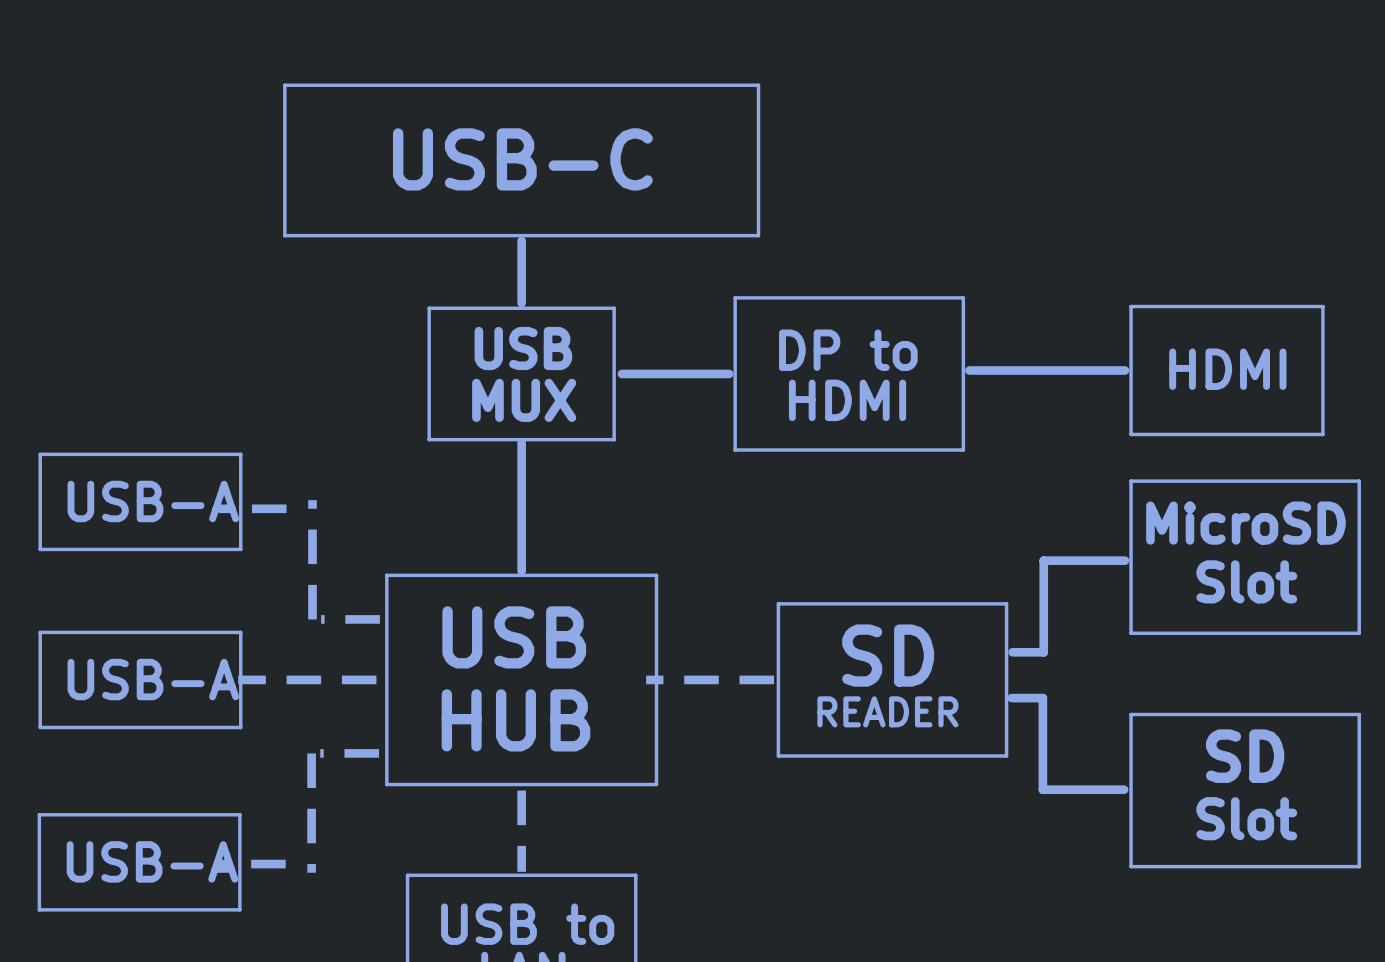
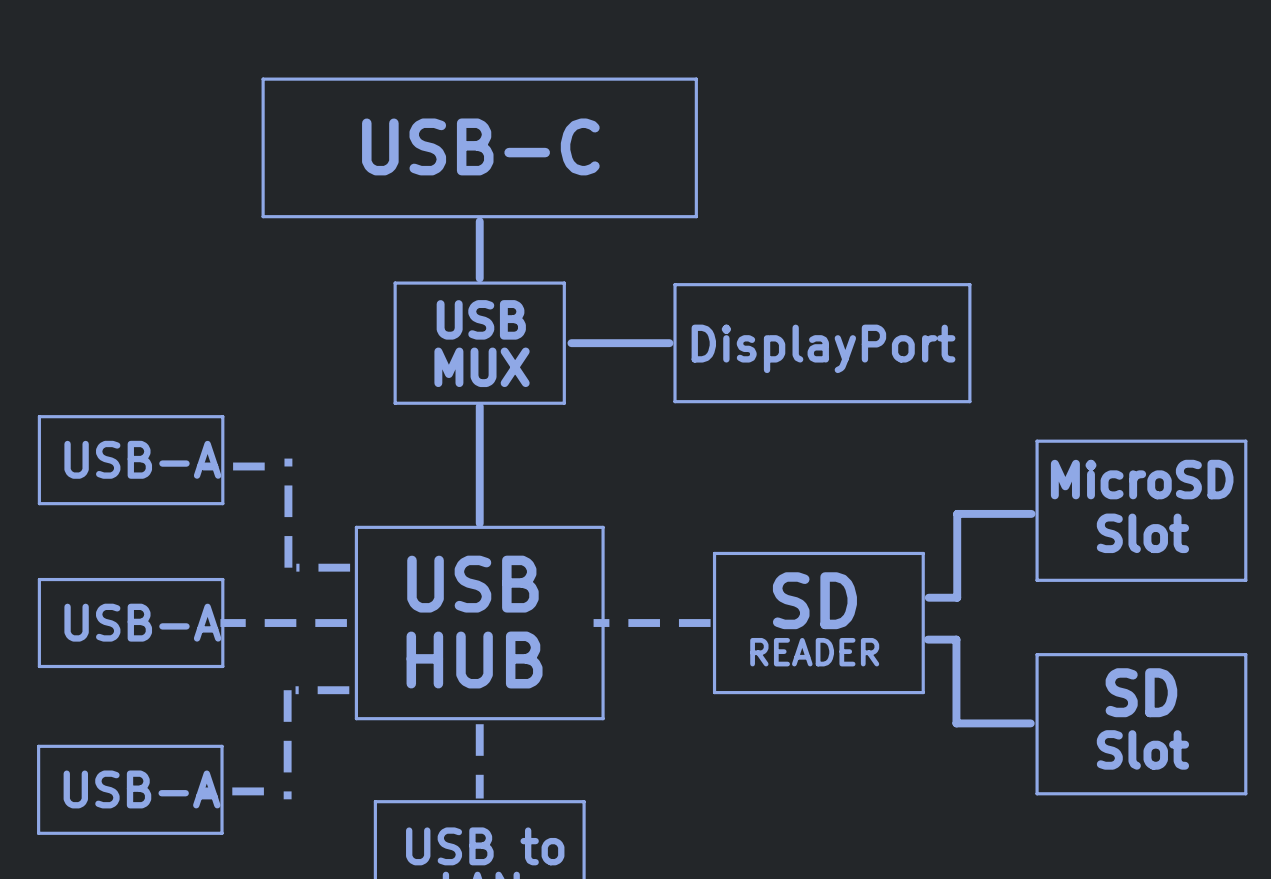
line: (1131, 306) (1322, 306) (1322, 434) (1131, 434) (1131, 306) -> none
line: (735, 309) (735, 297) (963, 297) (963, 450) (735, 450) (735, 437) -> (675, 284) (969, 284) (969, 401) (675, 401)
text: DP to (848, 350) -> none
text: HDMI (1227, 369) -> none
line: (969, 370) (1124, 370) -> none
text: none -> DisplayPort (823, 348)
text: HDMI (847, 400) -> none

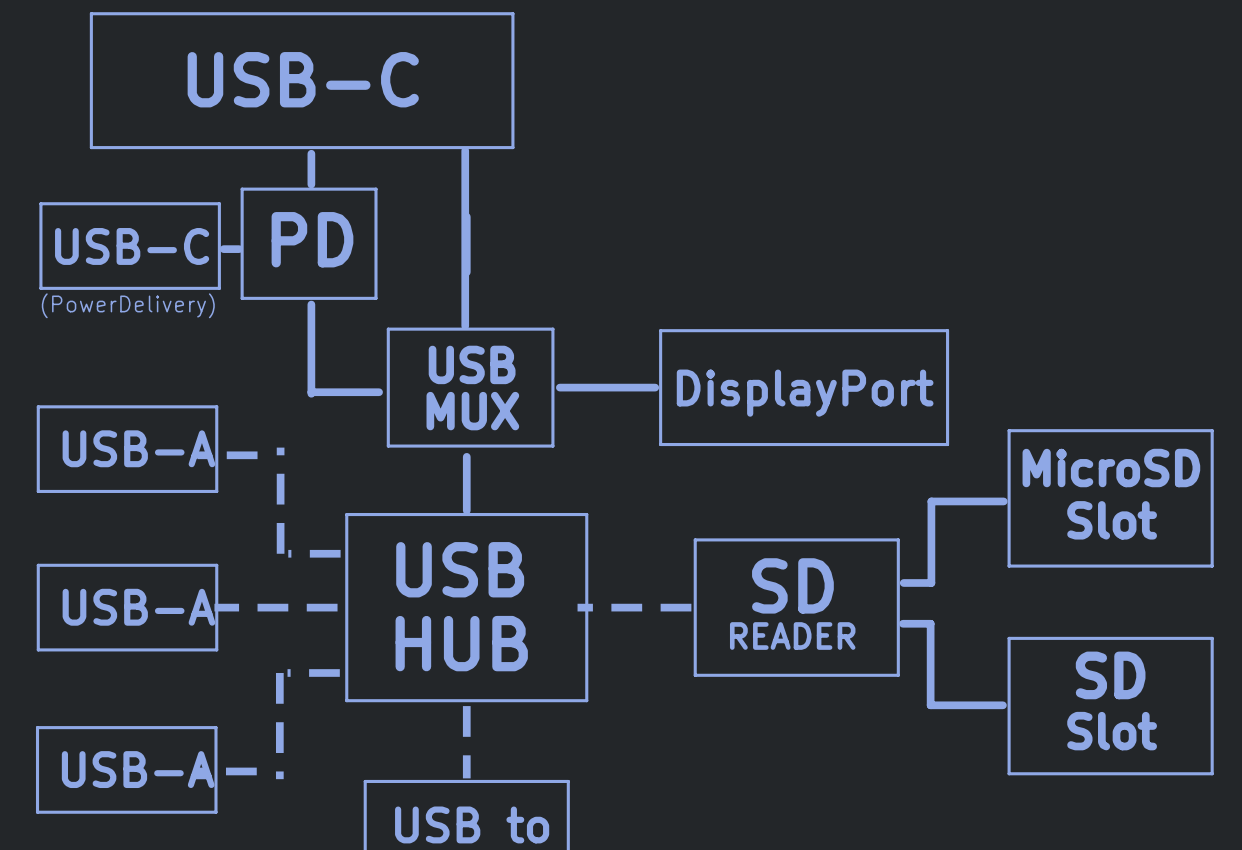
line: none -> (91, 13) (512, 13) (512, 147) (91, 147) (91, 13)
line: (263, 79) (696, 79) (696, 216) (263, 216) (263, 79) -> none
text: none -> USB-C (303, 79)
text: USB-C (480, 146) -> none
line: none -> (465, 150) (465, 326)
line: none -> (311, 153) (311, 184)
line: none -> (242, 189) (375, 189) (375, 298) (242, 298) (242, 189)
line: none -> (40, 203) (219, 203) (219, 288) (40, 288) (40, 203)
text: none -> PD (312, 239)
text: none -> USB-C (132, 246)
line: none -> (223, 249) (239, 249)
line: (395, 283) (564, 283) (564, 403) (395, 403) (395, 283) -> (388, 329) (552, 329) (552, 446) (388, 446) (388, 329)
line: (675, 284) (969, 284) (969, 401) (675, 401) (675, 284) -> (660, 330) (947, 330) (947, 444) (660, 444) (660, 330)
line: none -> (311, 304) (311, 393)
text: none -> (PowerDelivery) (128, 305)
text position: USB (481, 319) -> USB (472, 364)
line: (571, 343) (669, 343) -> (559, 387) (655, 387)
text position: DisplayPort (823, 348) -> DisplayPort (805, 393)
text position: MUX (482, 367) -> MUX (472, 411)
line: none -> (311, 392) (379, 392)
line: (479, 406) (479, 468) -> none

